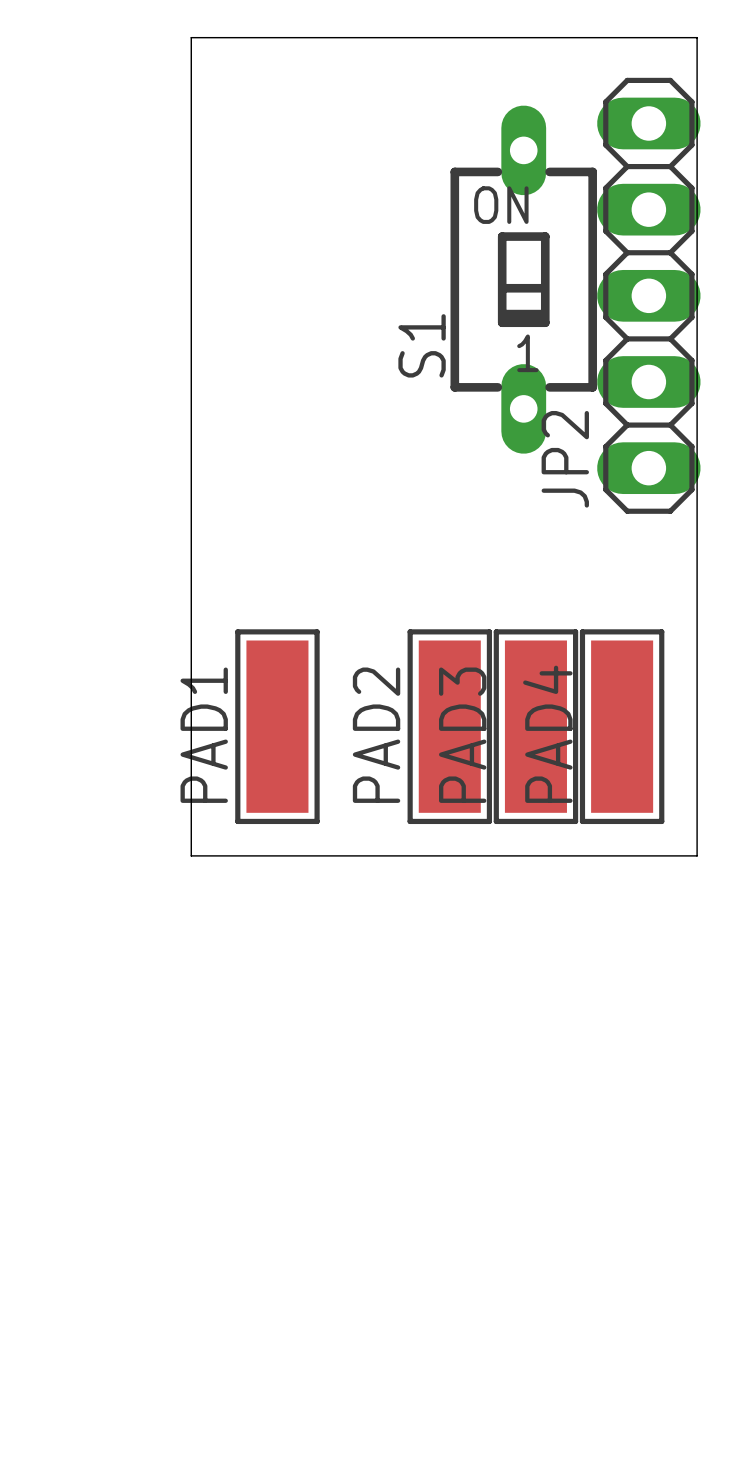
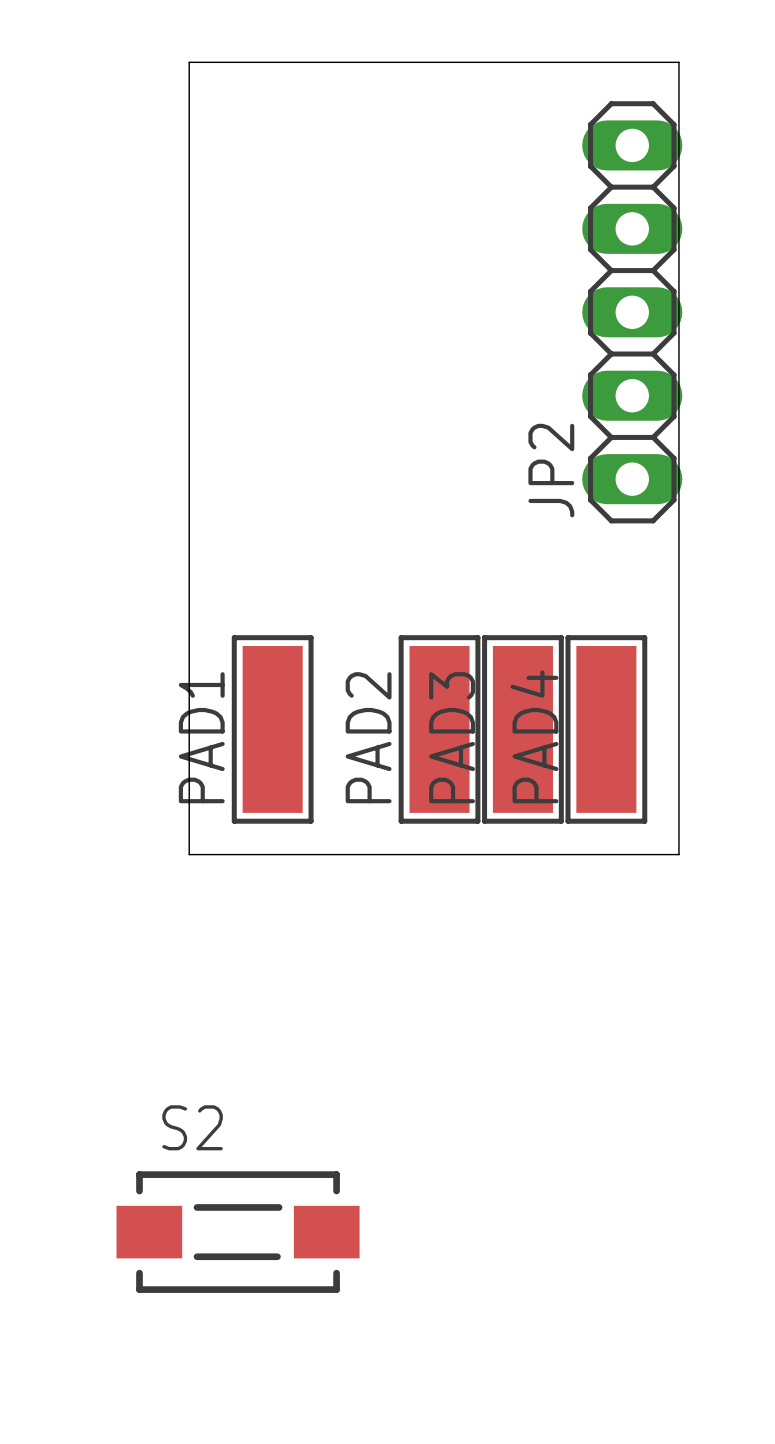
S1: (523, 279) -> none
S2: none -> (238, 1232)

